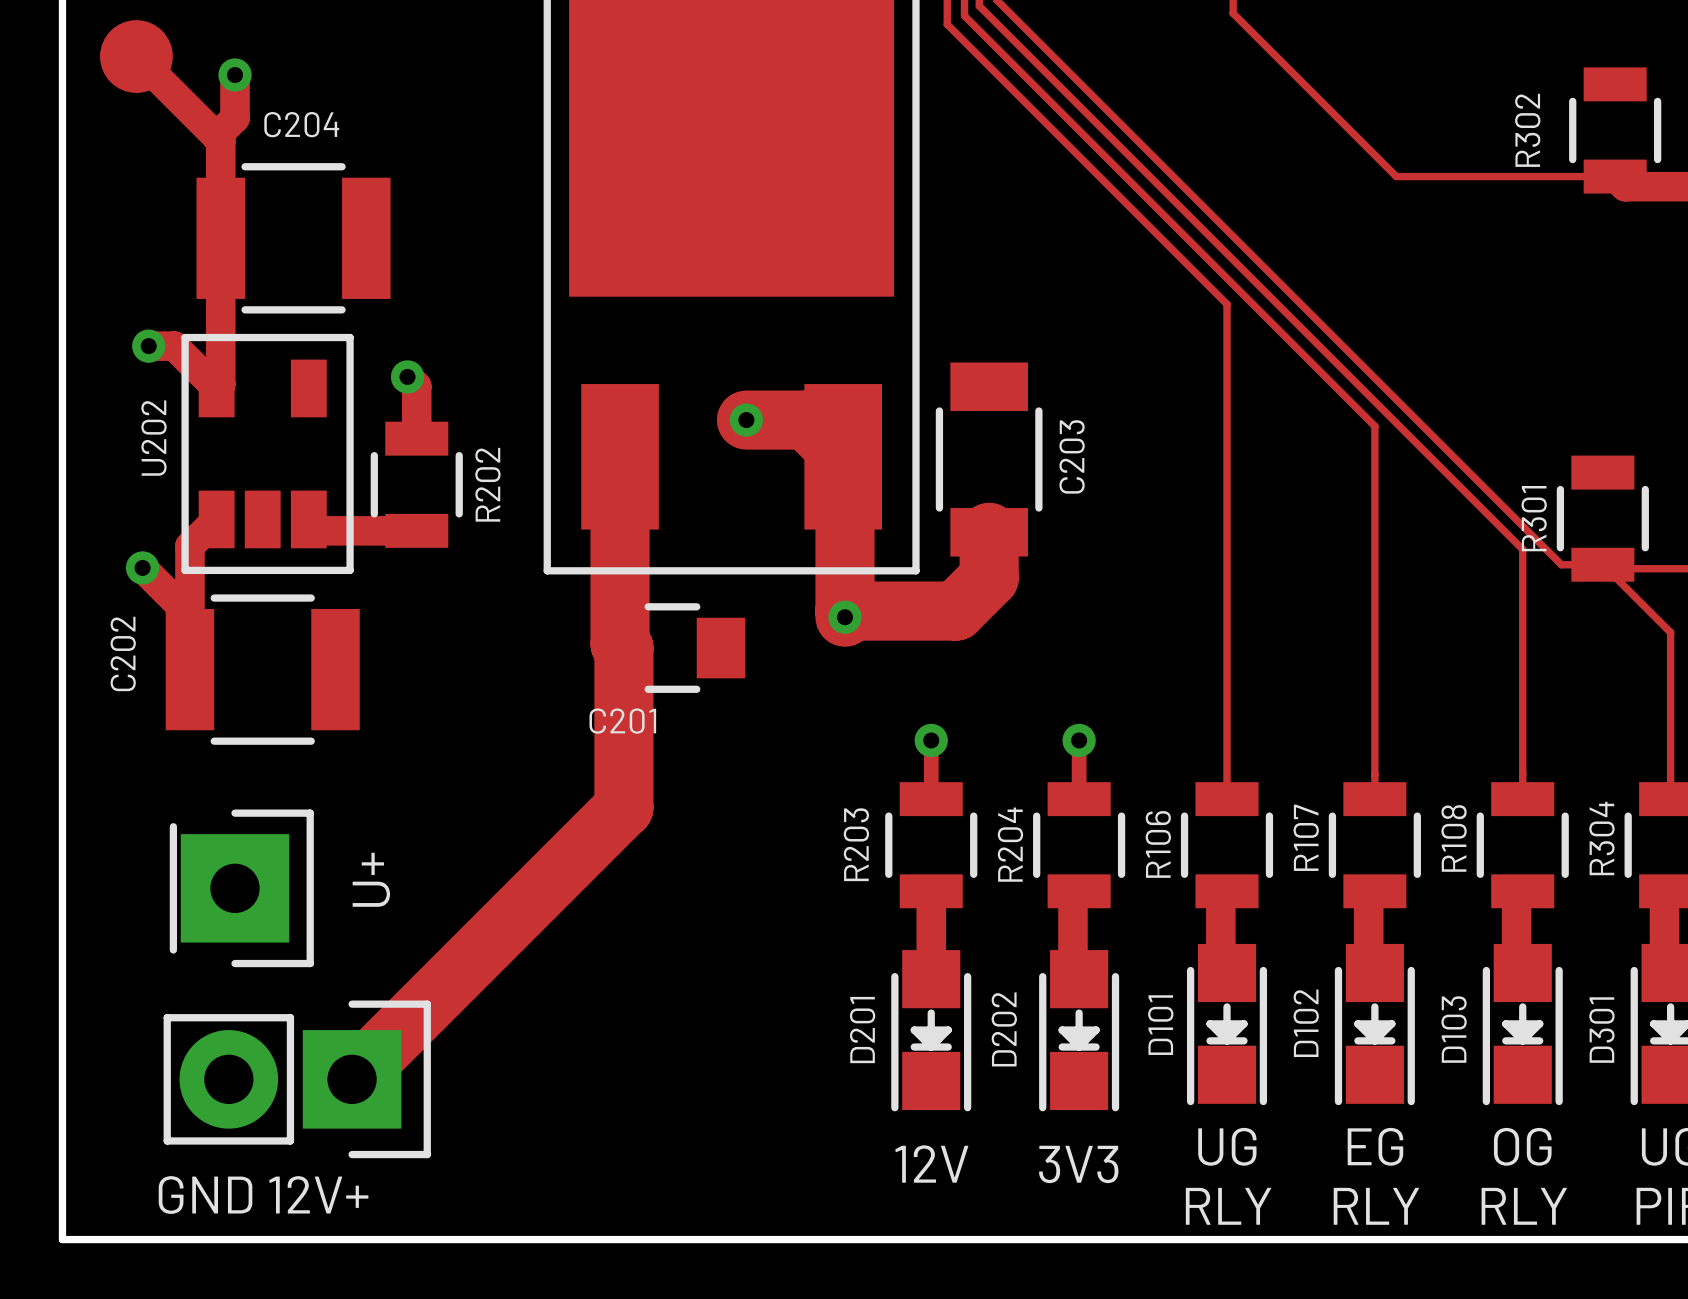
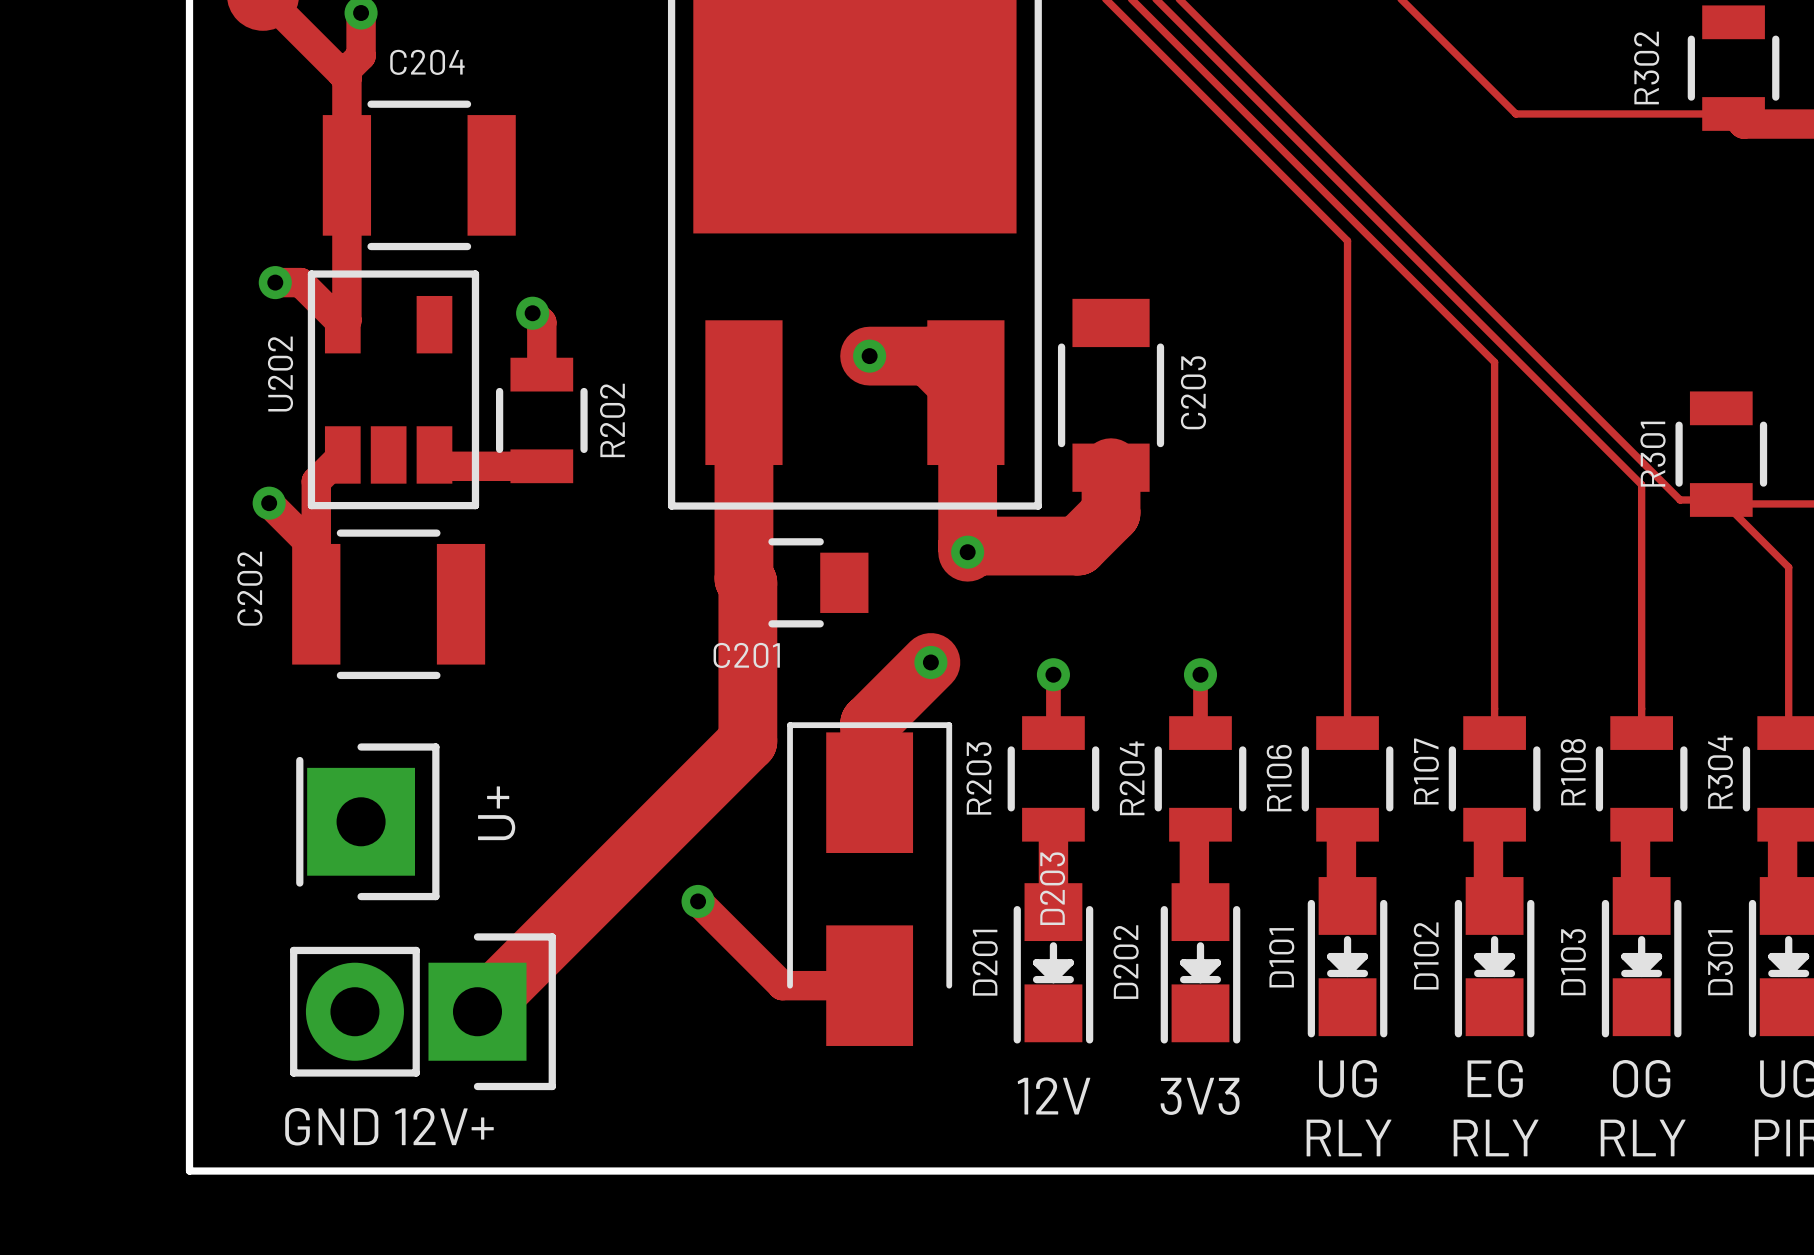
track: none -> (930, 662) (869, 723) (869, 792)
via: none -> (930, 662)
D203: none -> (869, 884)
track: none -> (698, 901) (782, 985) (869, 985)
via: none -> (698, 901)

